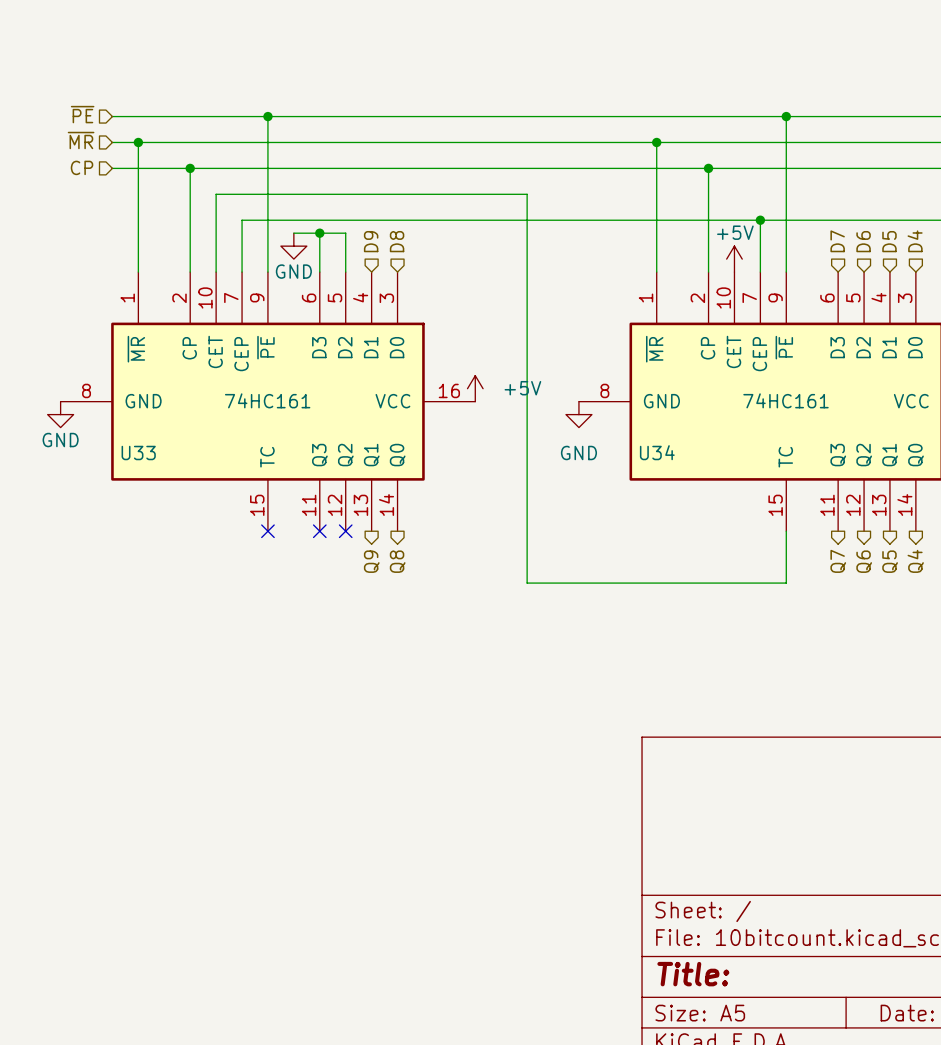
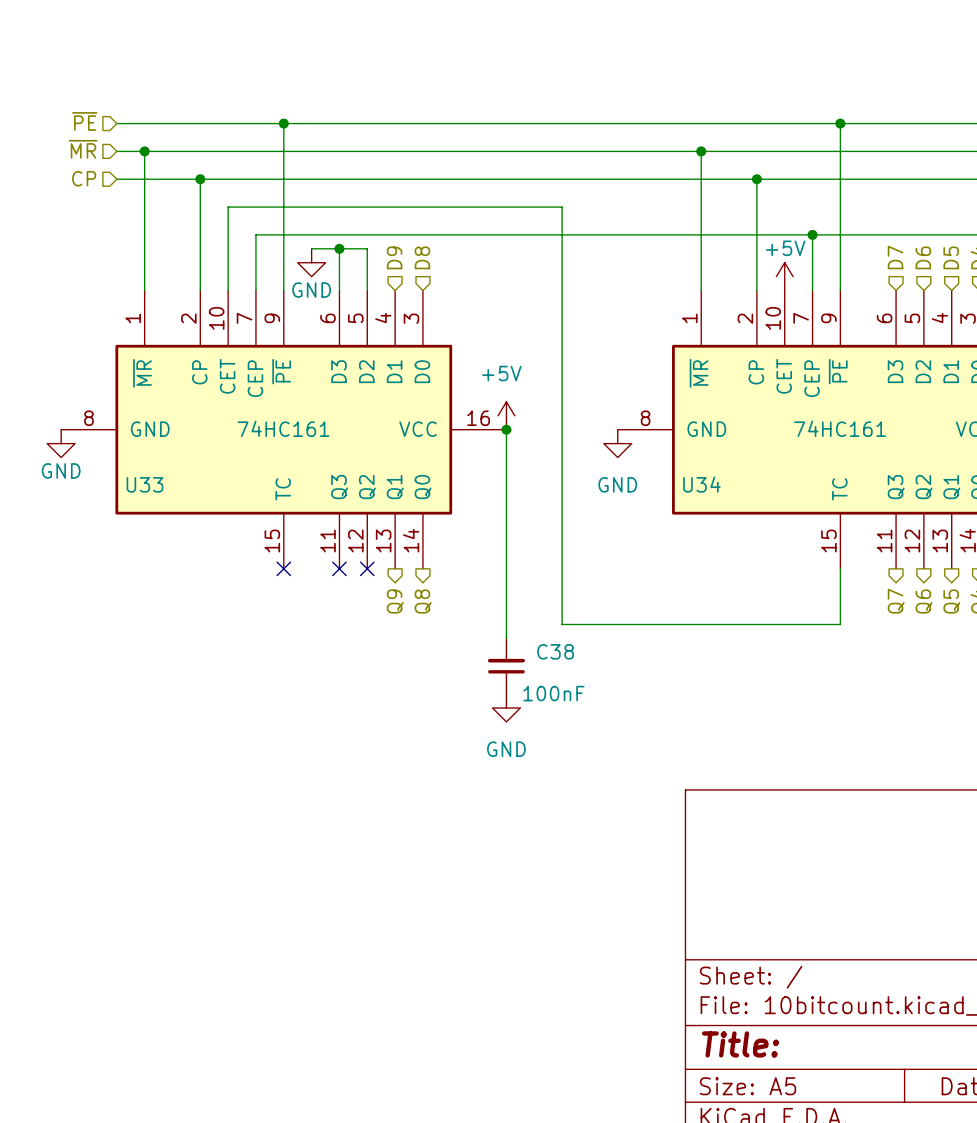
power symbol text position: +5V (522, 388) -> +5V (501, 373)
wire: none -> (506, 429) (506, 638)
junction: none -> (506, 429)
C38: none -> 100nF (506, 666)
power symbol: none -> GND (506, 708)

